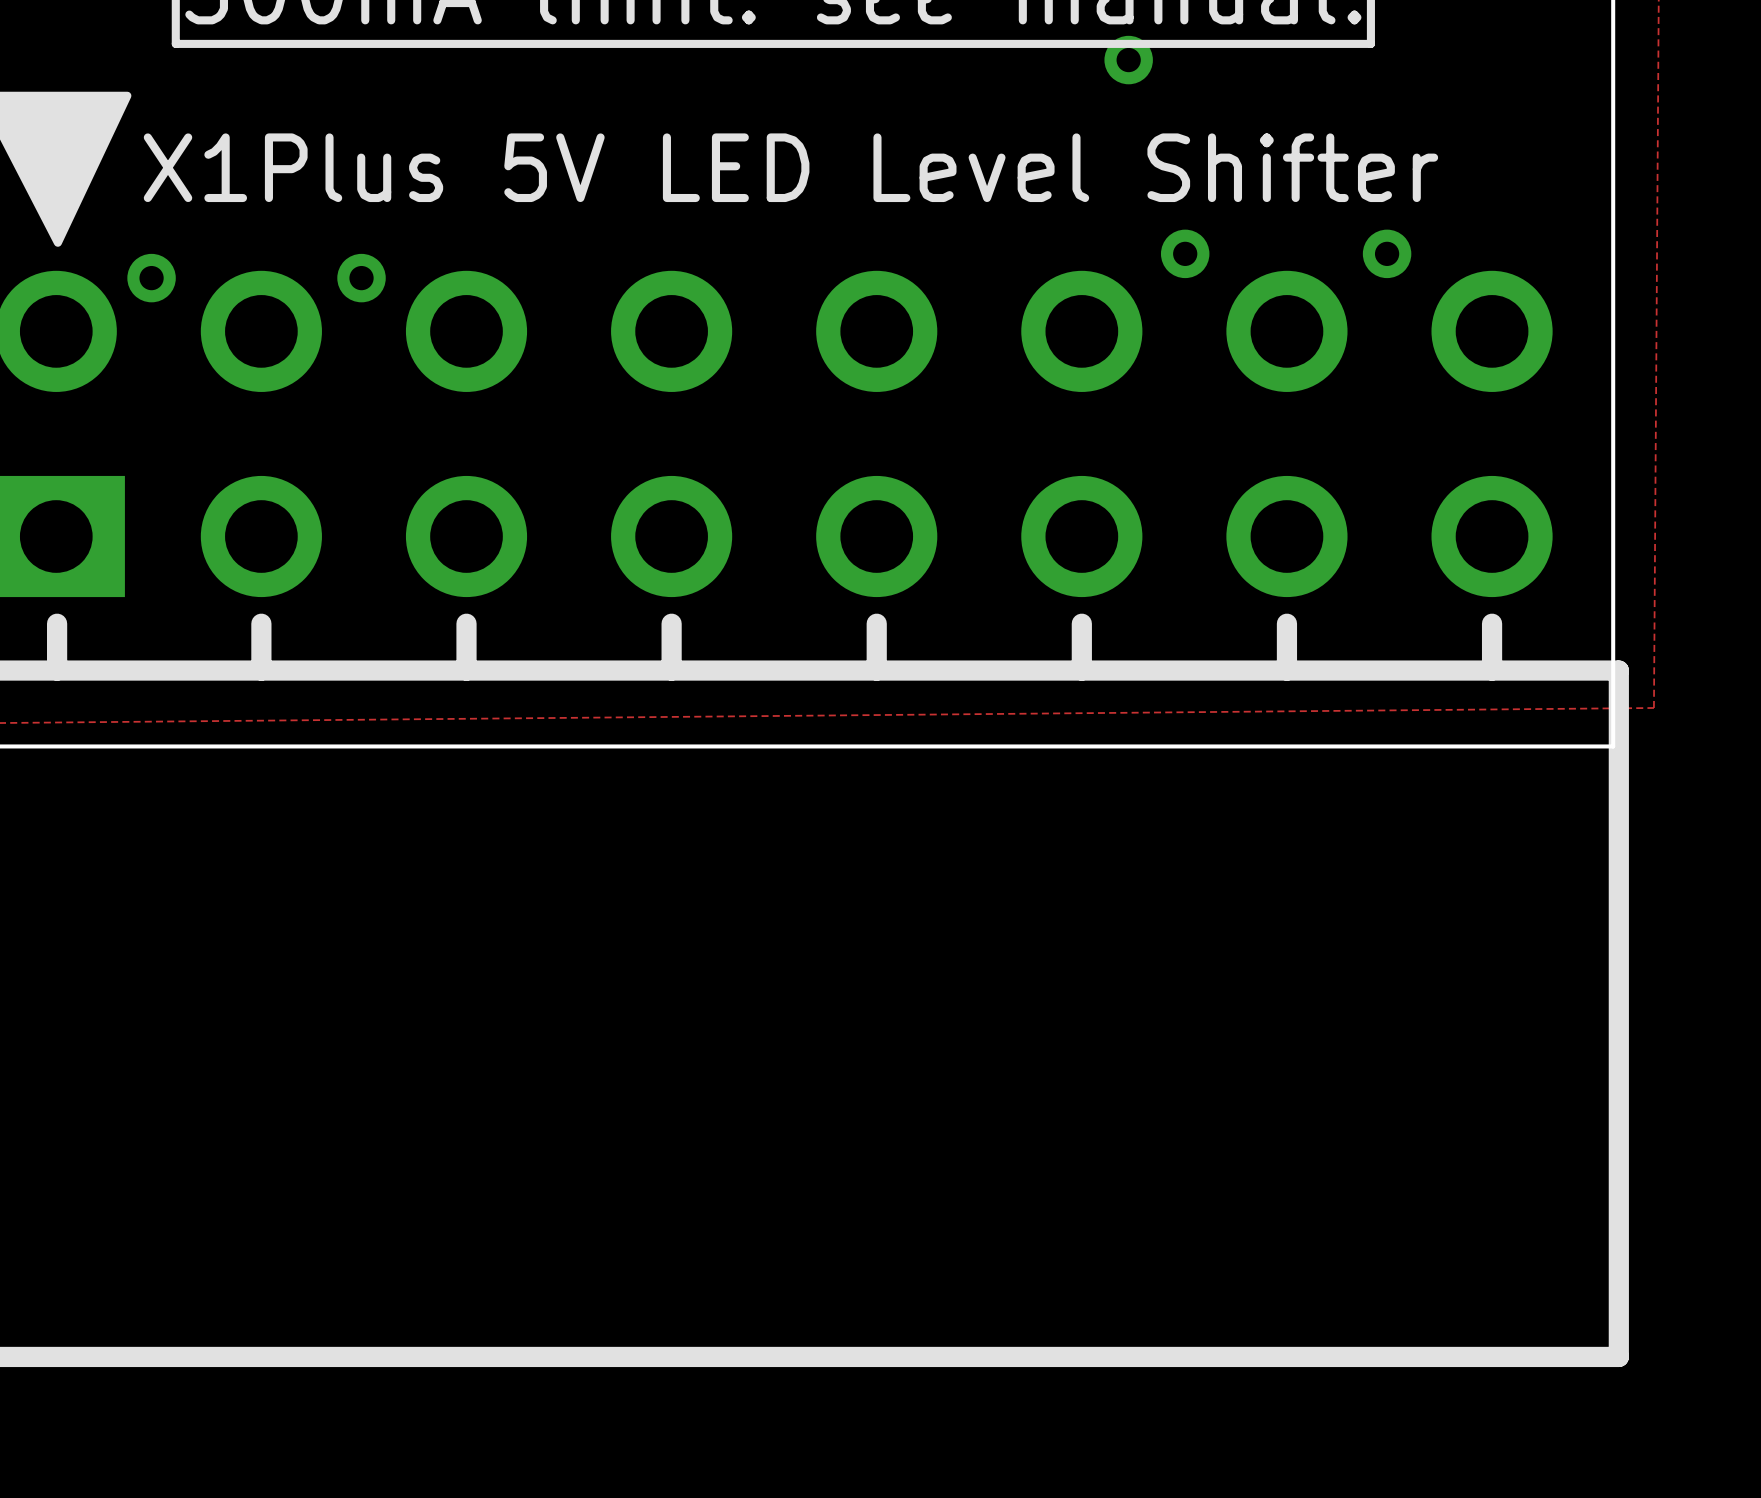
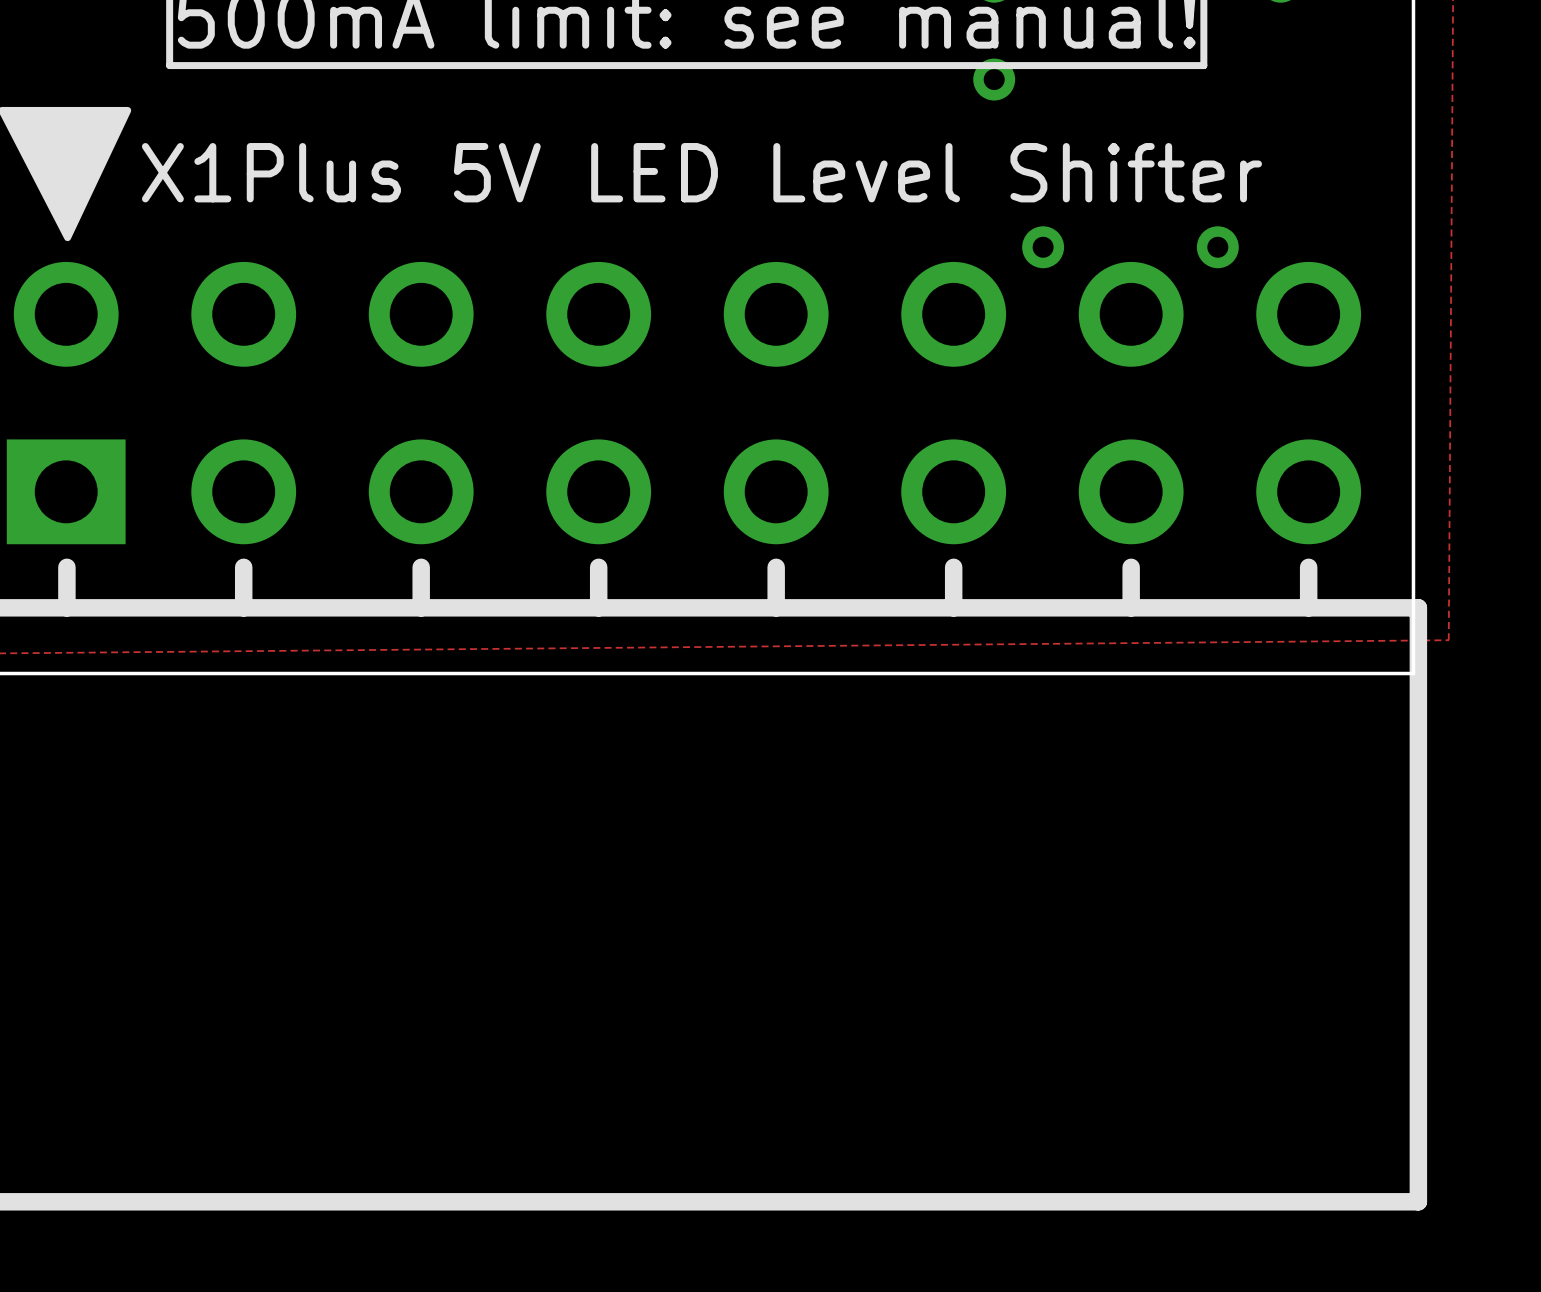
via: (151, 278) -> none
via: (361, 278) -> none

